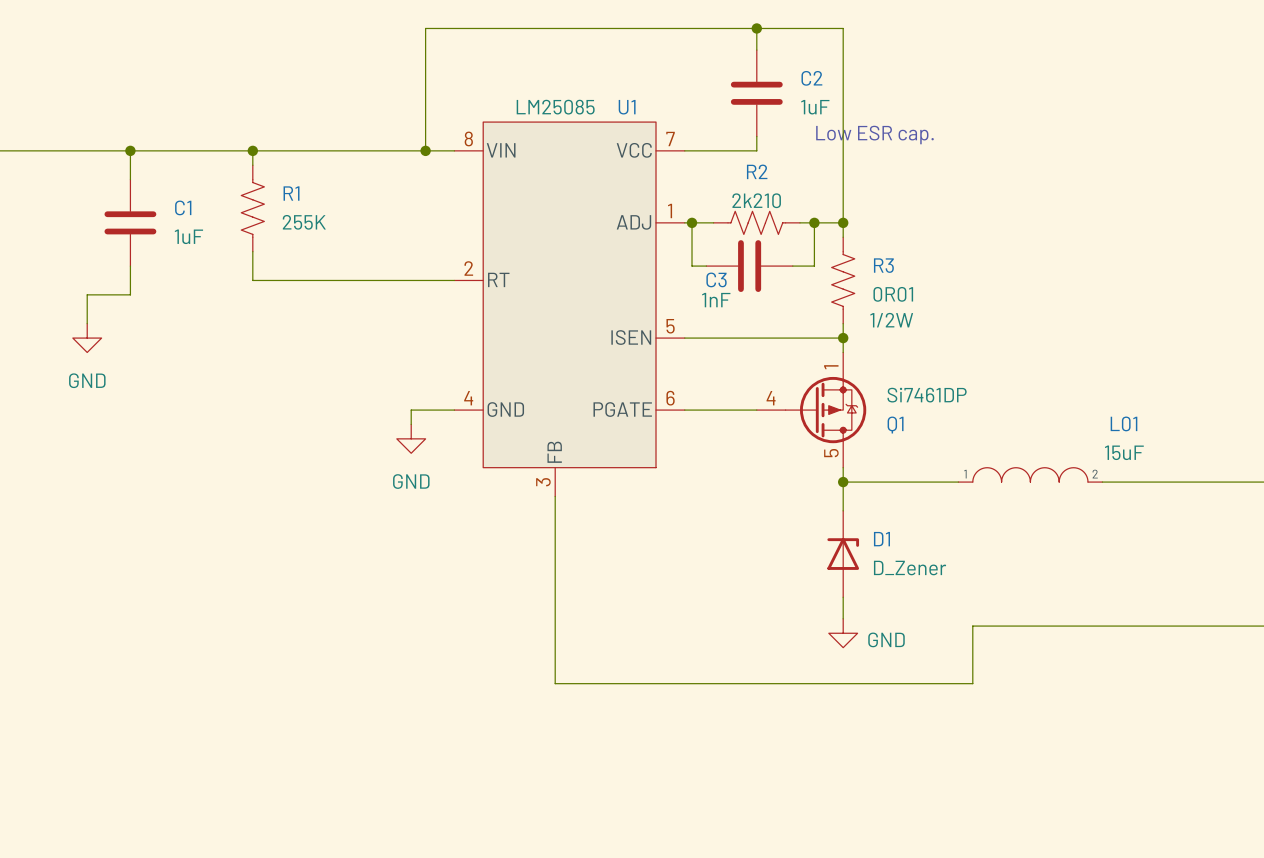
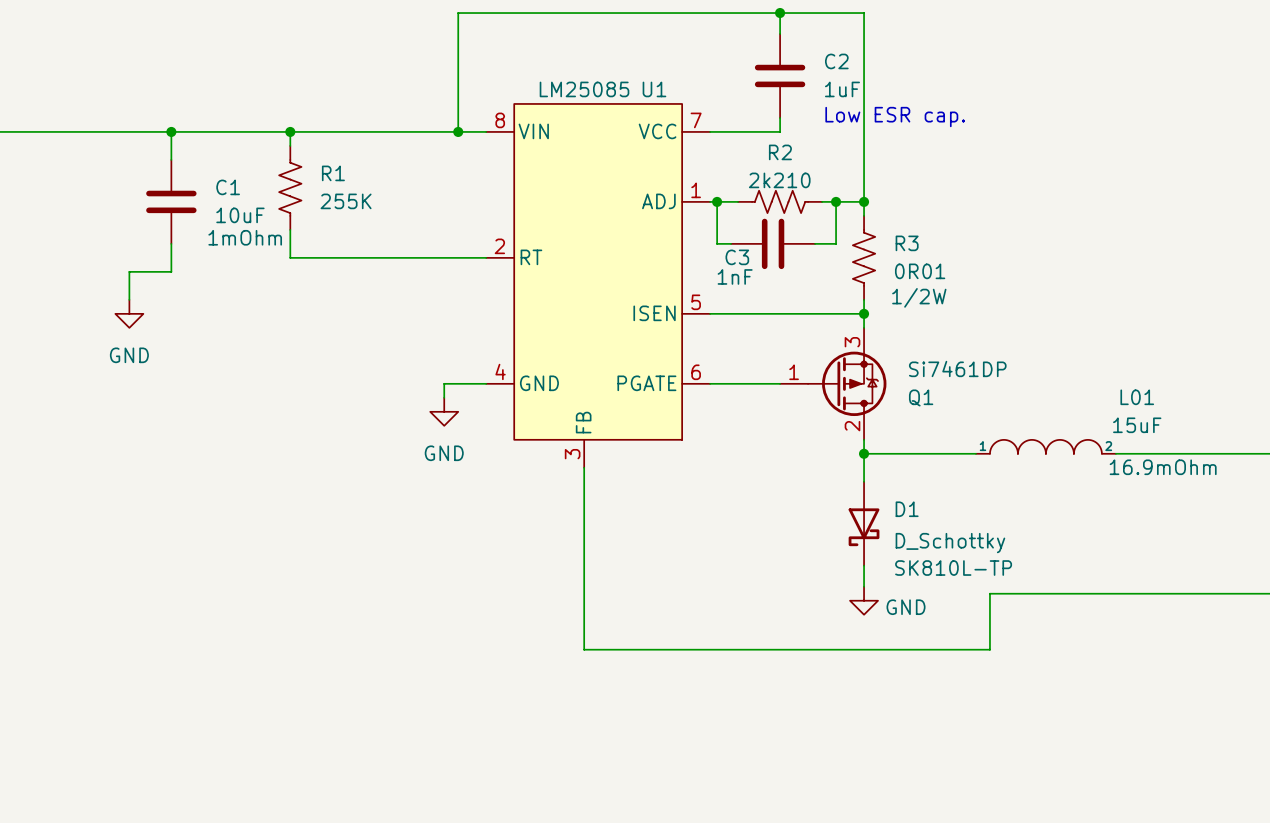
C1 value: 1uF (188, 236) -> 10uF (240, 215)
C1 text: none -> 1mOhm (245, 237)
Q1 pin number: 1 (831, 367) -> 3 (852, 342)
Q1 pin number: 4 (771, 398) -> 1 (794, 372)
Q1 pin number: 5 (831, 453) -> 2 (852, 426)
L01 text: none -> 16.9mOhm (1163, 467)
D1 symbol: [827, 510, 860, 598] -> [848, 481, 880, 566]
D1 value: D_Zener (910, 568) -> D_Schottky (950, 543)
D1 text: none -> SK810L-TP (953, 568)

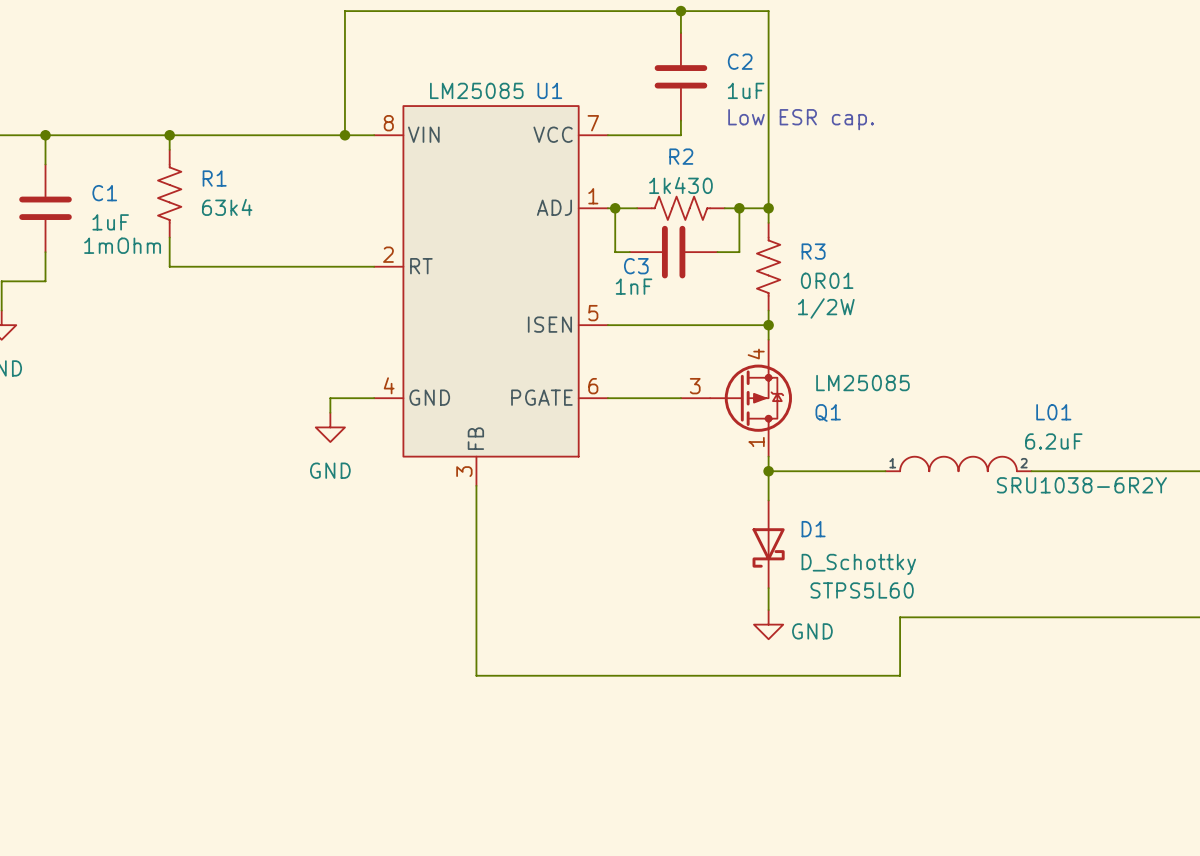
R2 value: 2k210 (779, 180) -> 1k430 (680, 185)
R1 value: 255K (346, 201) -> 63k4 (227, 207)
C1 value: 10uF (240, 215) -> 1uF (110, 222)
Q1 pin number: 3 (852, 342) -> 4 (756, 354)
Q1 value: Si7461DP (957, 368) -> LM25085 (862, 383)
Q1 pin number: 1 (794, 372) -> 3 (695, 386)
L01 value: 15uF (1137, 425) -> 6.2uF (1053, 441)
Q1 pin number: 2 (852, 426) -> 1 (756, 442)
L01 text: 16.9mOhm (1163, 467) -> SRU1038-6R2Y (1081, 485)
D1 text: SK810L-TP (953, 568) -> STPS5L60 (862, 590)

